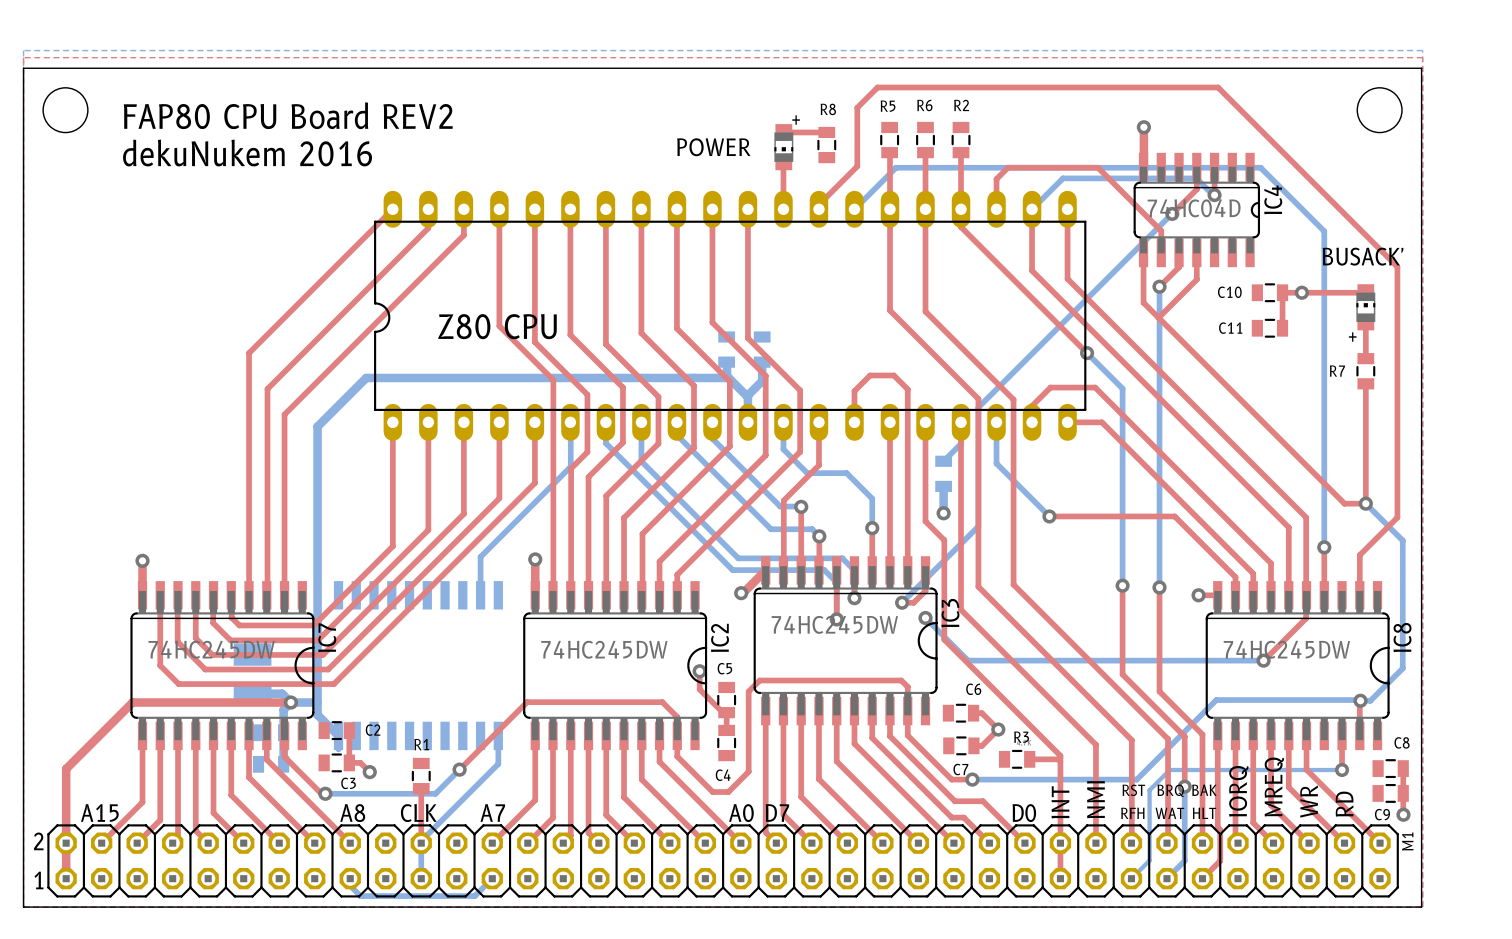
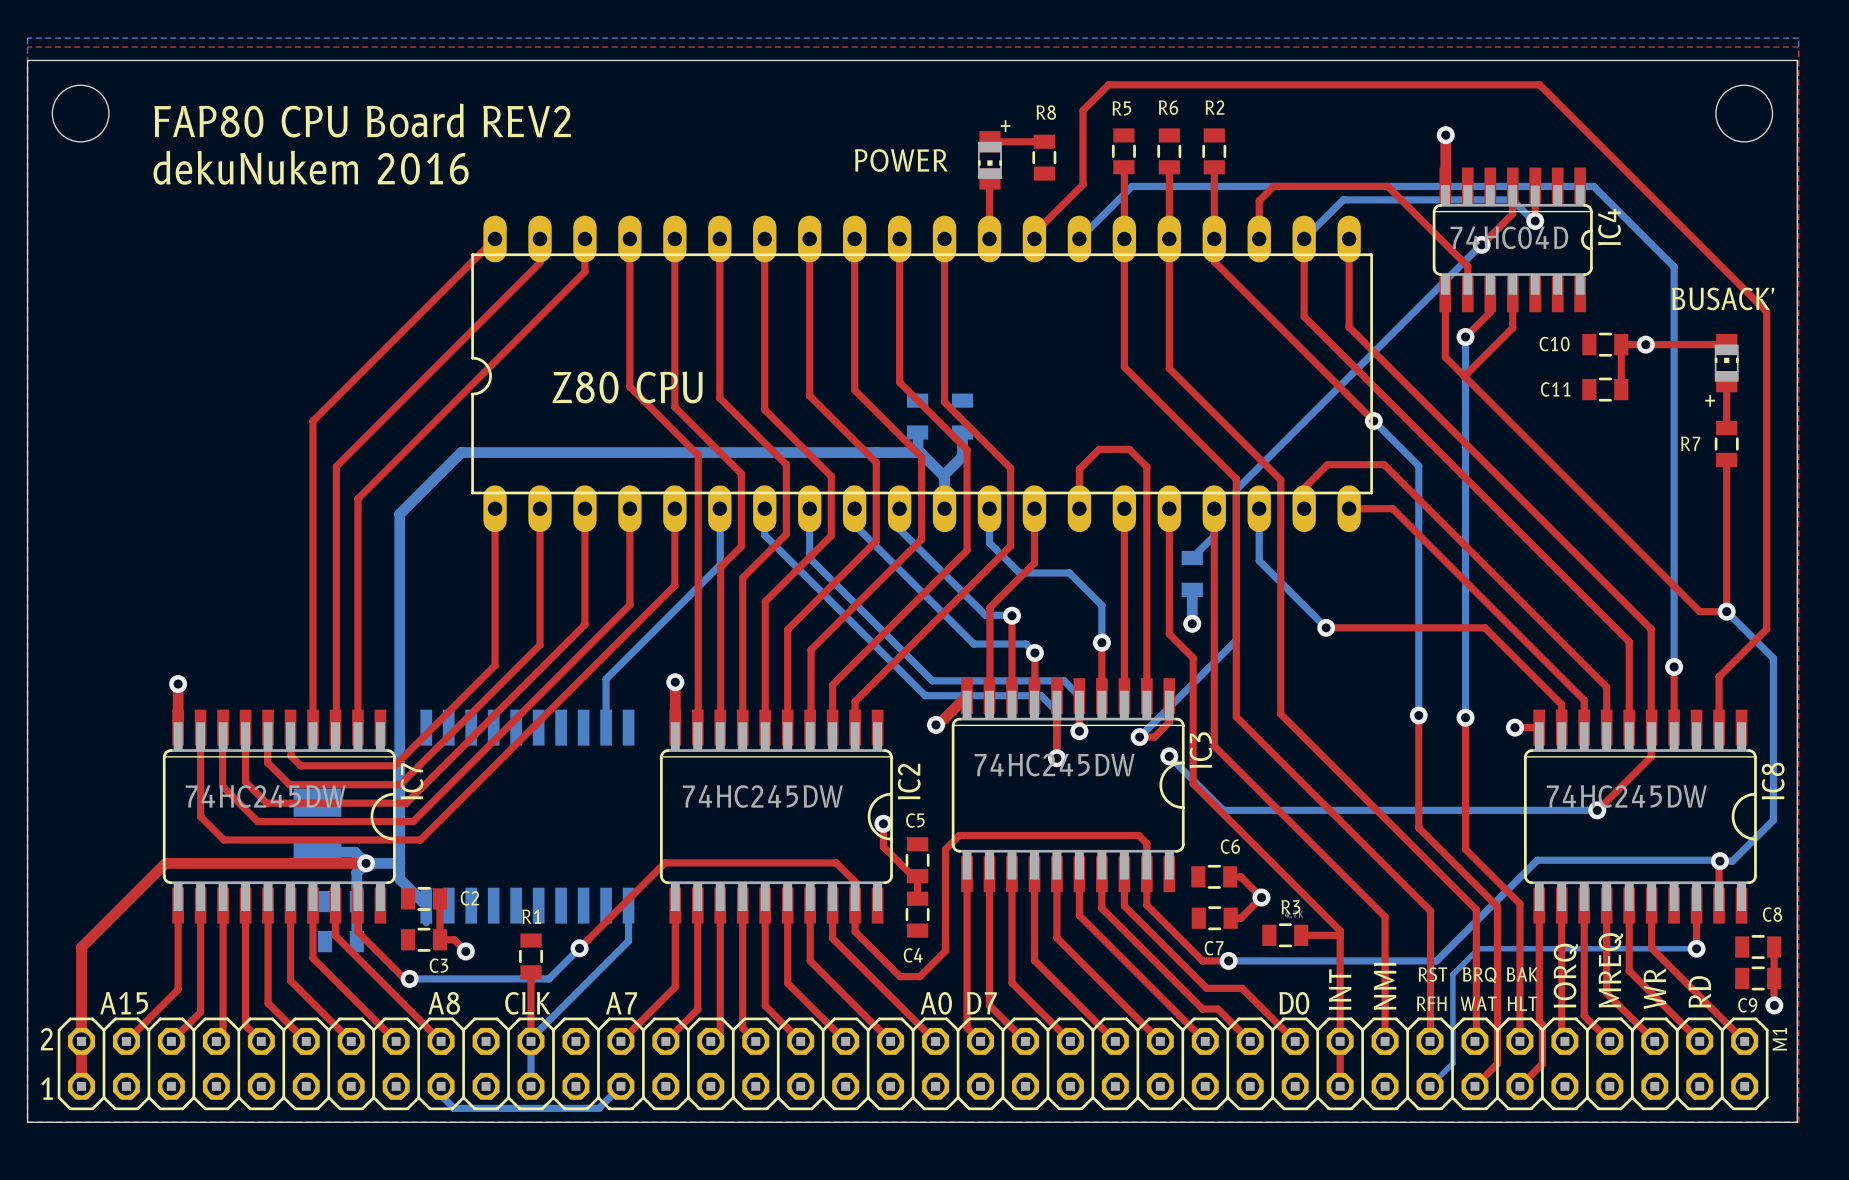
bottom track: (1184, 786) (1184, 860) (1166, 878) -> none
top track: none -> (1497, 969) (1497, 1063) (1474, 1086)
via: (1184, 786) -> none

